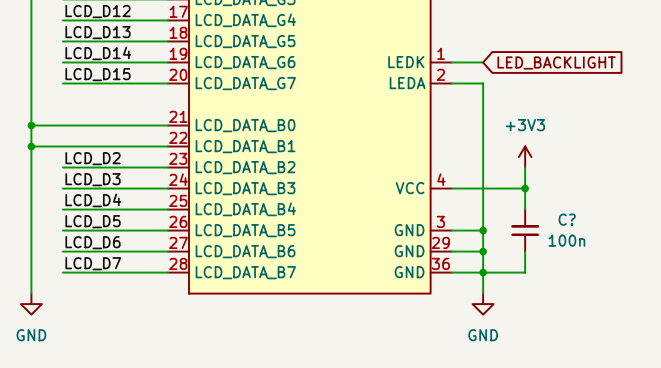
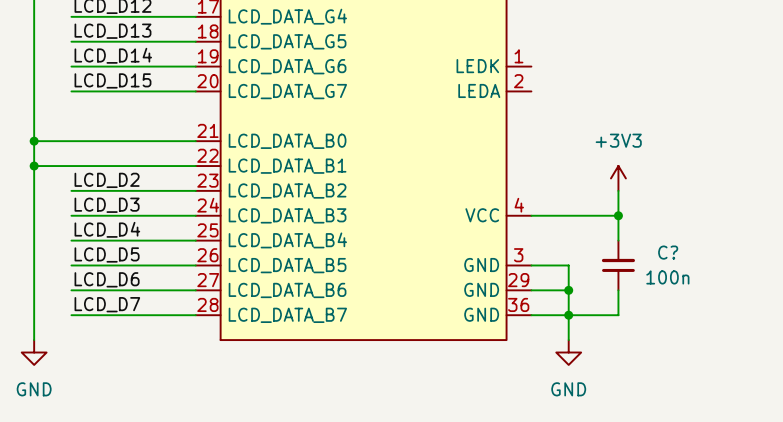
wire: (451, 62) (483, 62) -> none
global label: LED_BACKLIGHT (556, 62) -> none
wire: (451, 83) (483, 83) (483, 230) -> none
junction: (483, 230) -> none

